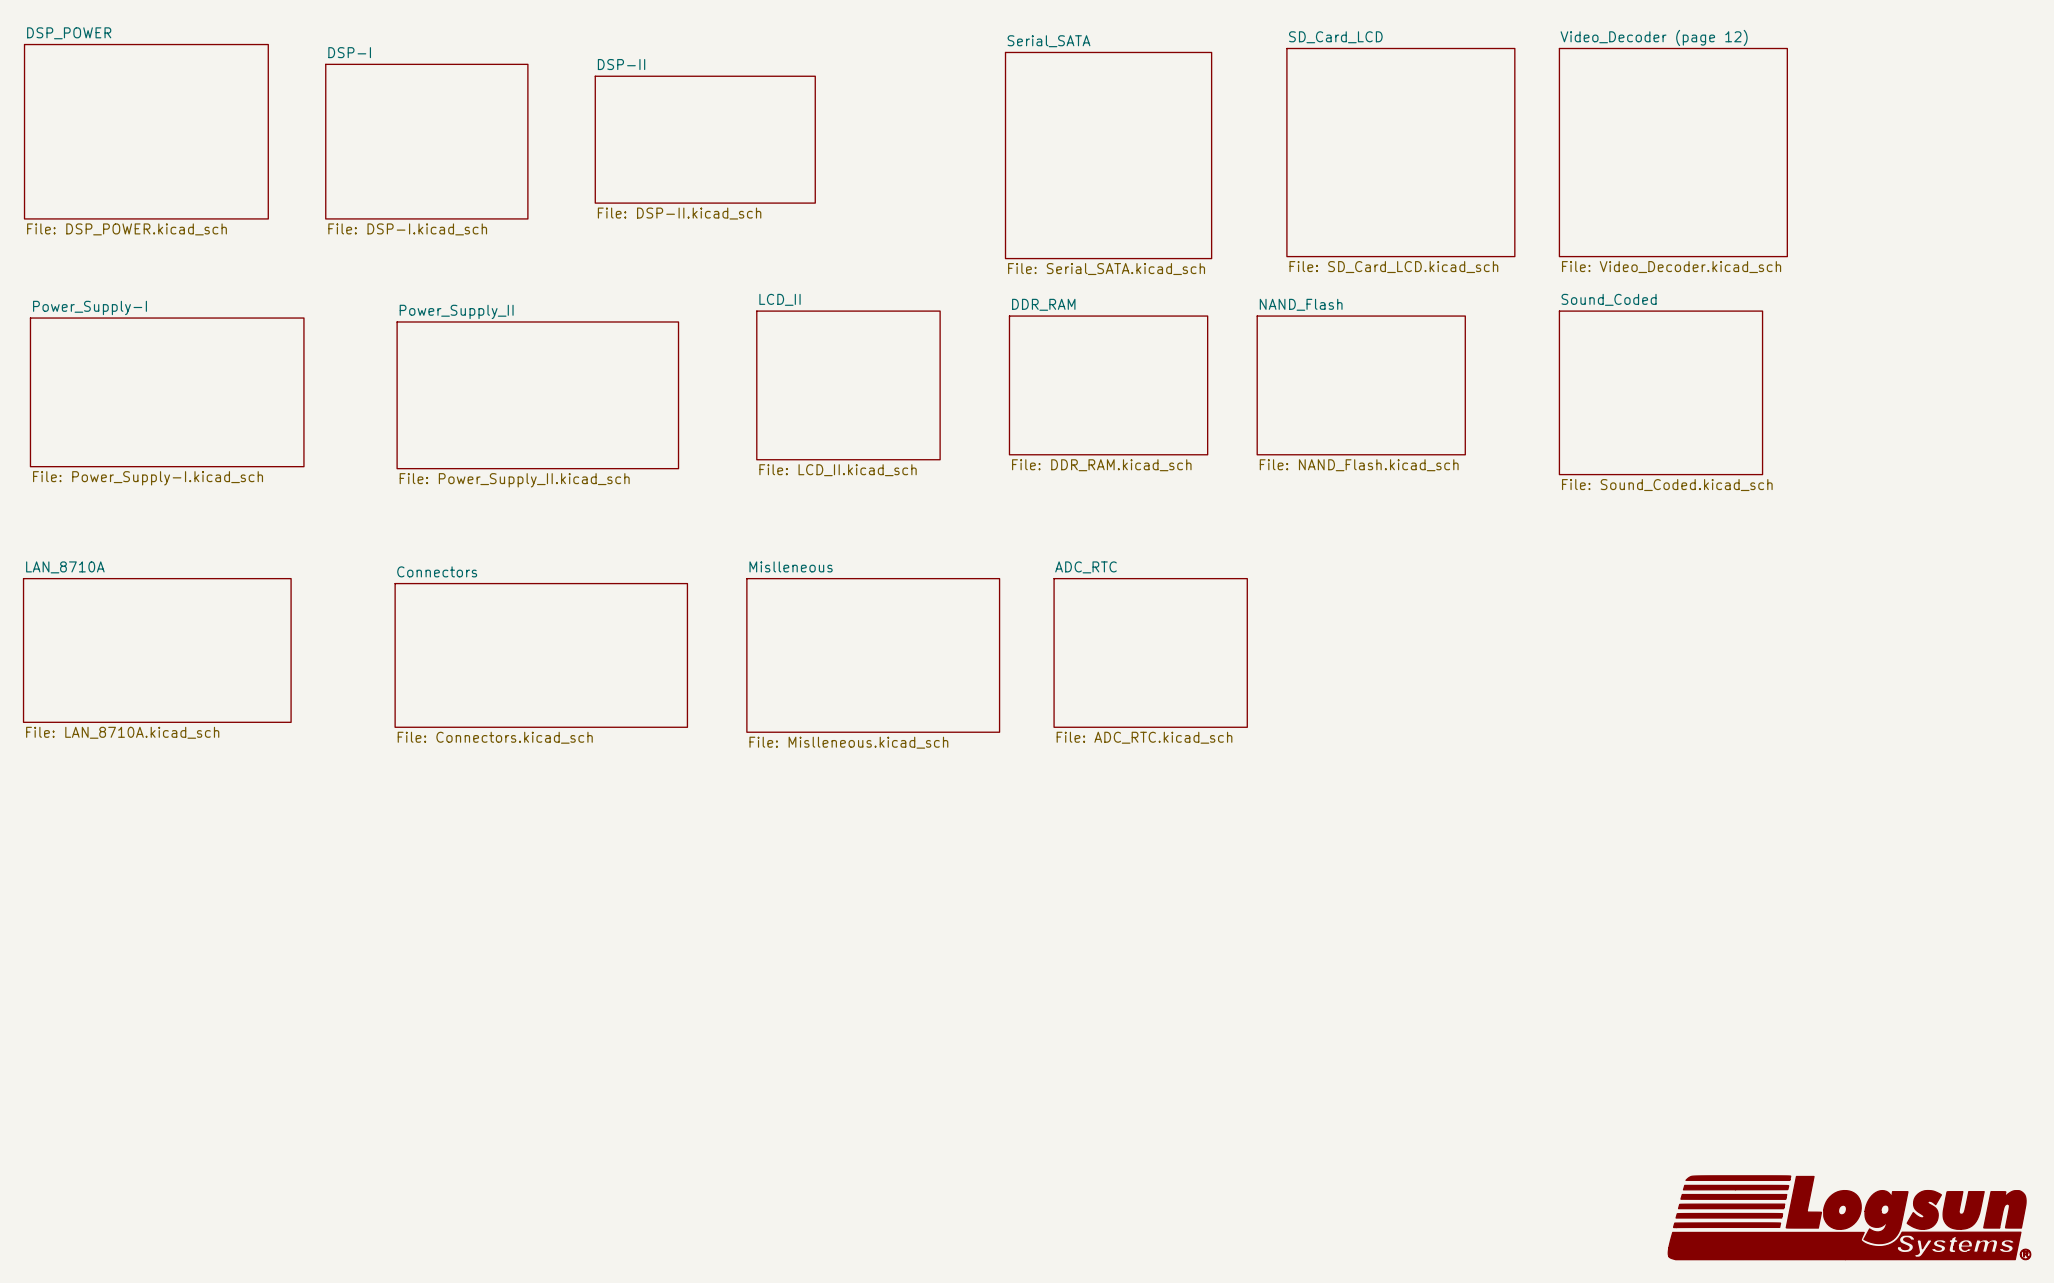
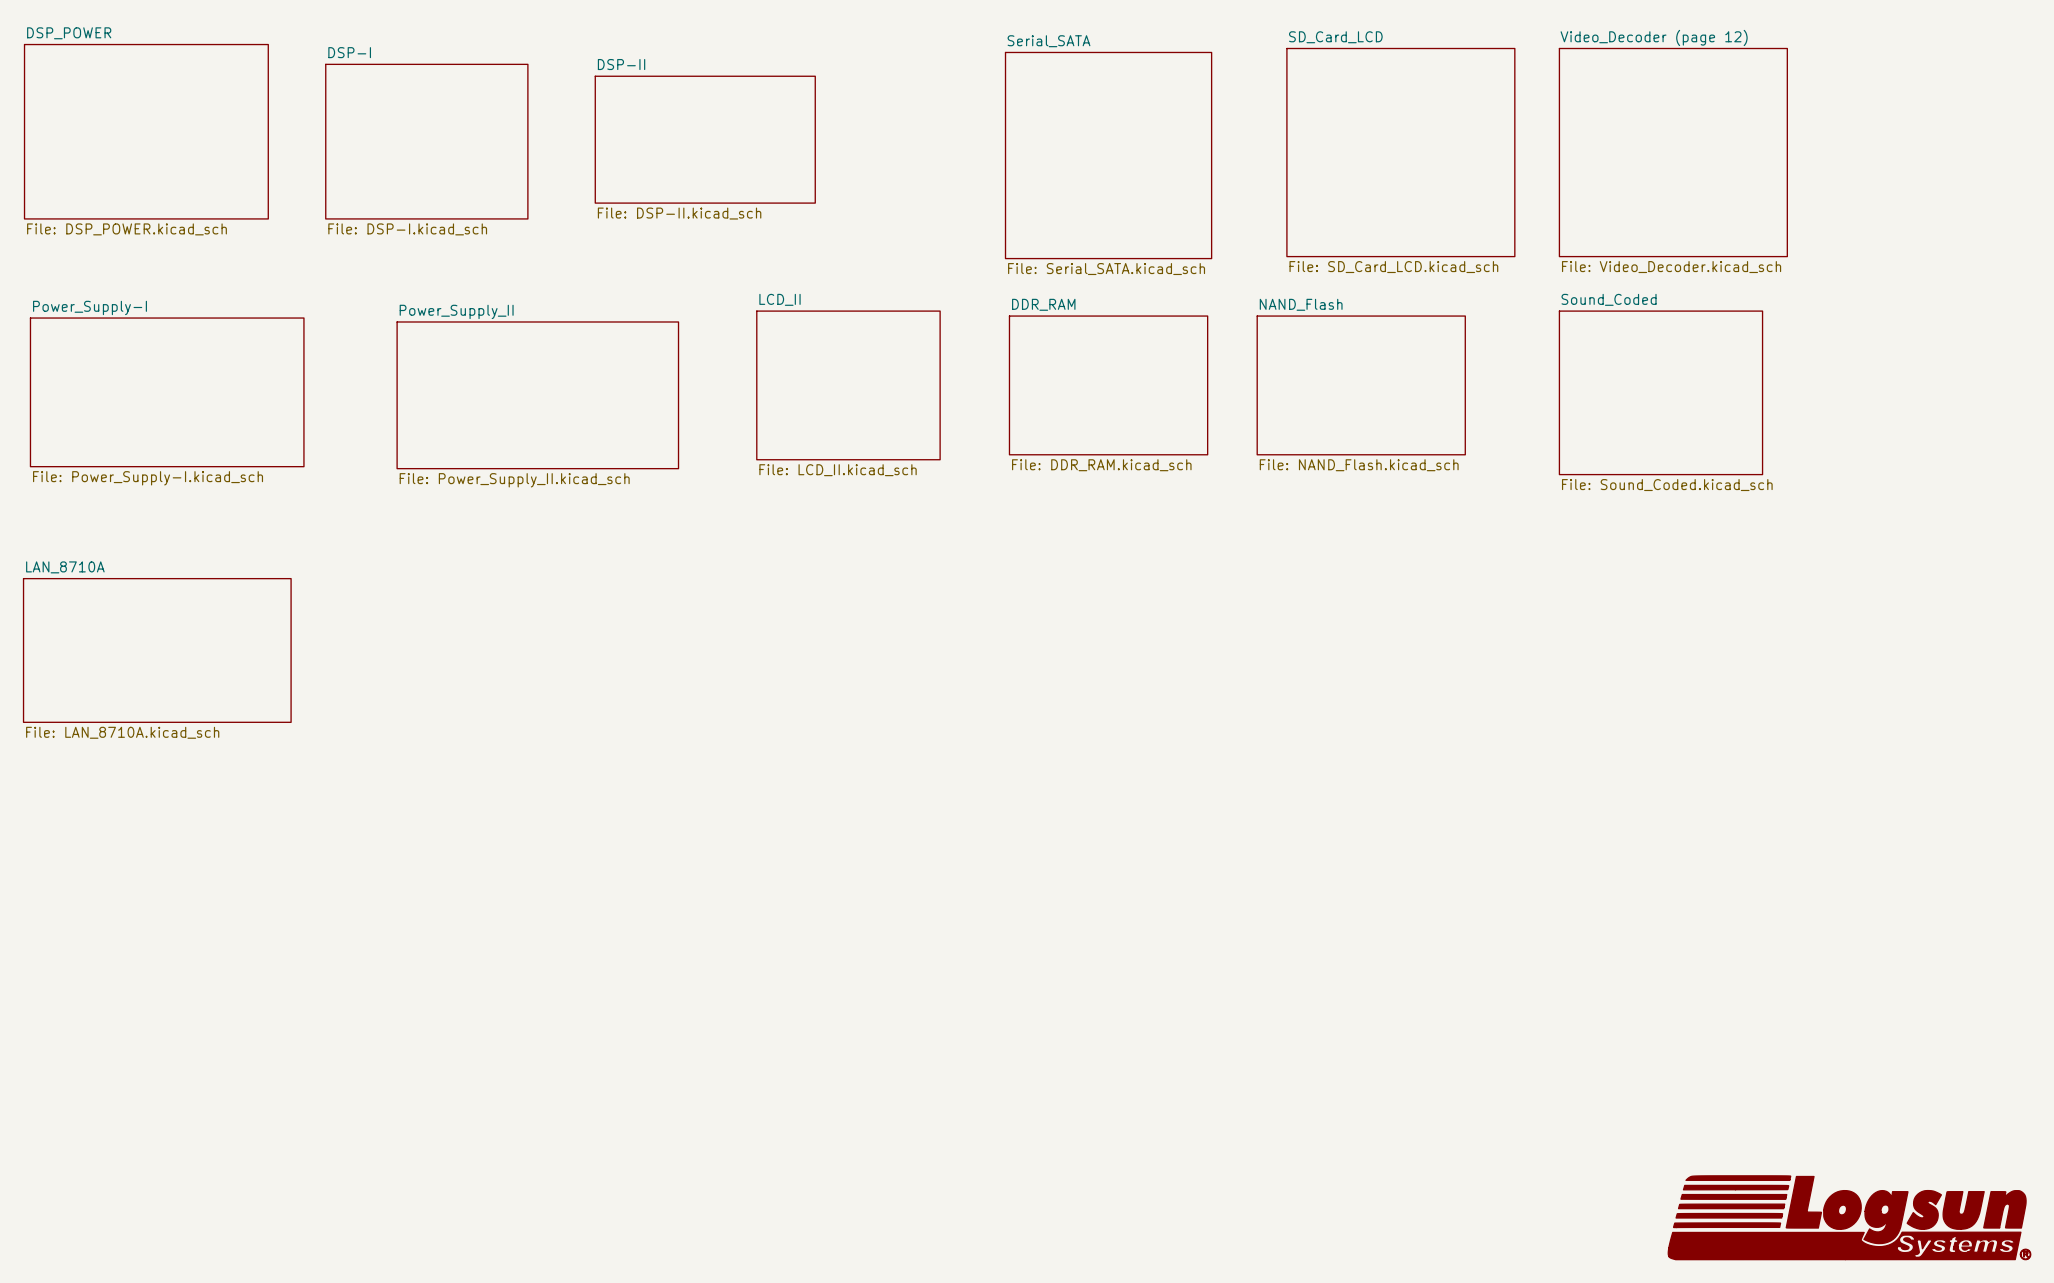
sheet ADC_RTC: File: ADC_RTC.kicad_sch (1150, 652) -> none
sheet Connectors: File: Connectors.kicad_sch (541, 655) -> none
sheet Mislleneous: File: Mislleneous.kicad_sch (873, 655) -> none

